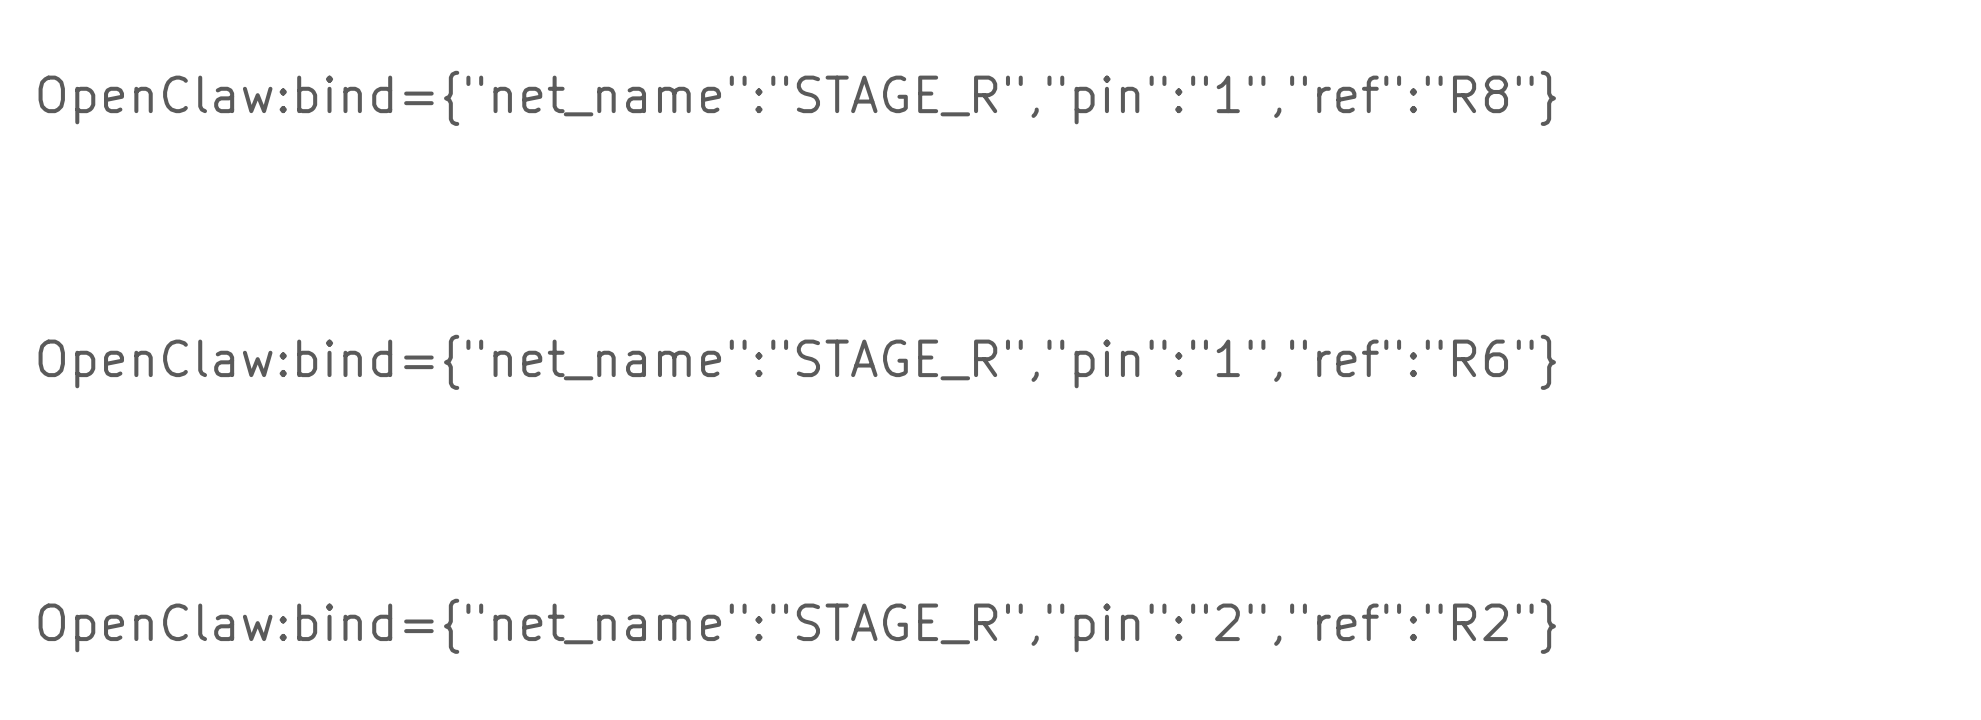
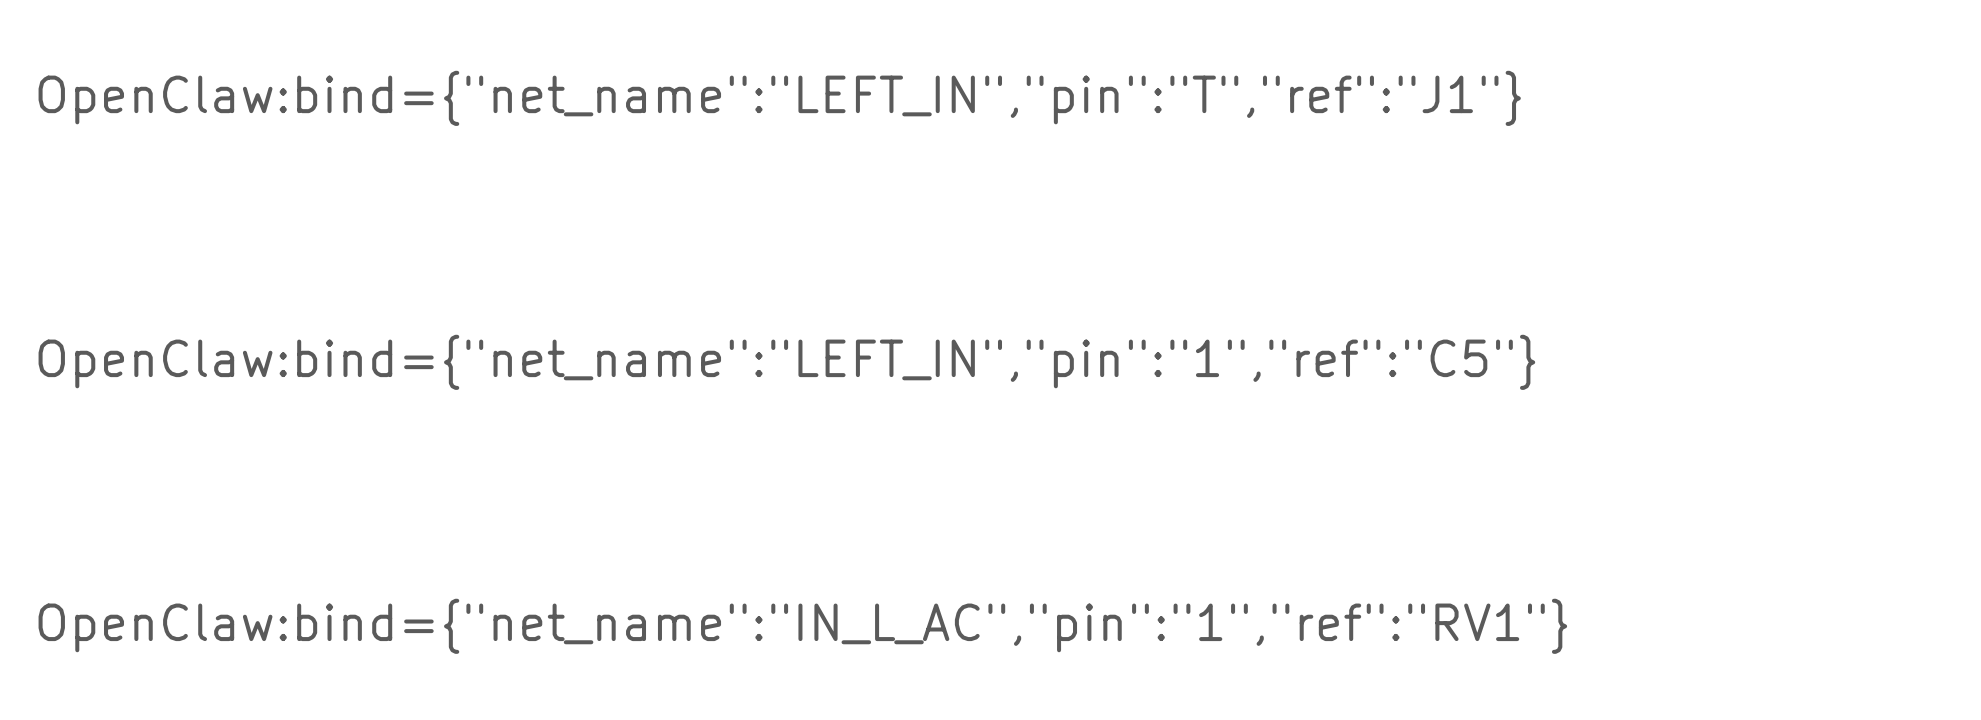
text: OpenClaw:bind={"net_name":"STAGE_R","pin":"1","ref":"R8"} (797, 98) -> OpenClaw:bind={"net_name":"LEFT_IN","pin":"T","ref":"J1"} (779, 98)
text: OpenClaw:bind={"net_name":"STAGE_R","pin":"1","ref":"R6"} (797, 362) -> OpenClaw:bind={"net_name":"LEFT_IN","pin":"1","ref":"C5"} (786, 362)
text: OpenClaw:bind={"net_name":"STAGE_R","pin":"2","ref":"R2"} (797, 626) -> OpenClaw:bind={"net_name":"IN_L_AC","pin":"1","ref":"RV1"} (802, 626)

